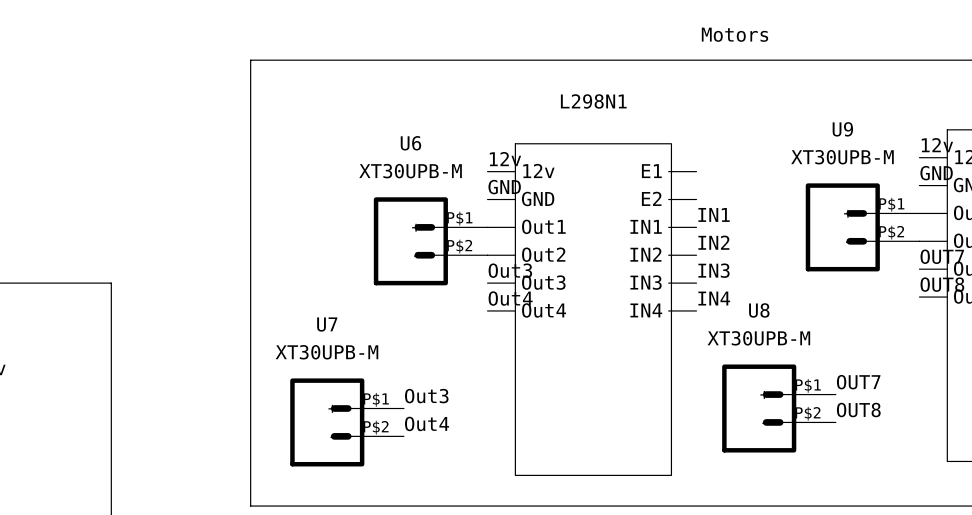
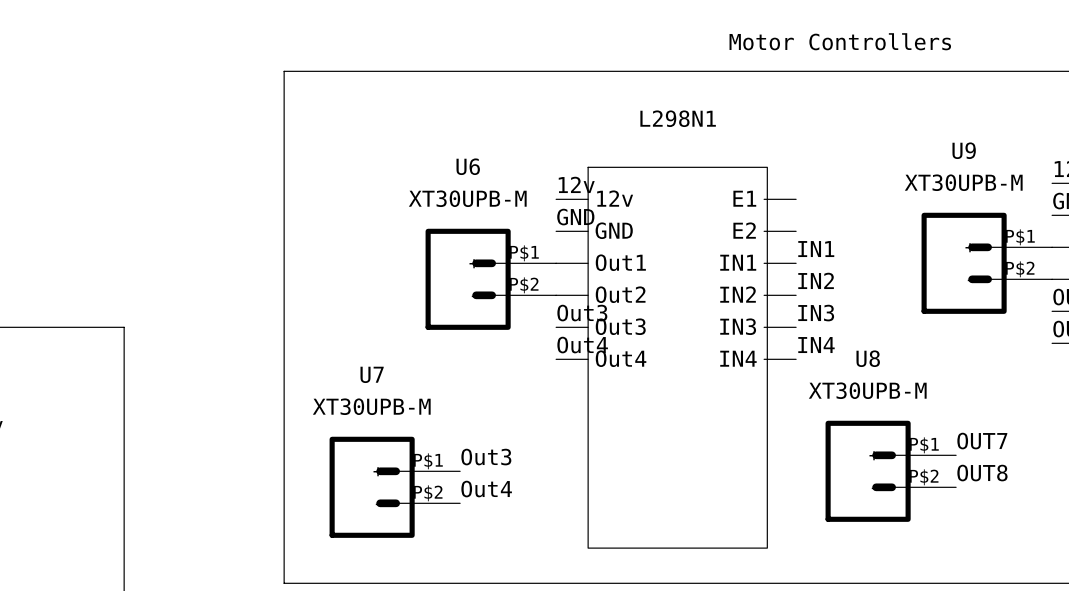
text: Motors (734, 34) -> Motor Controllers (840, 41)

